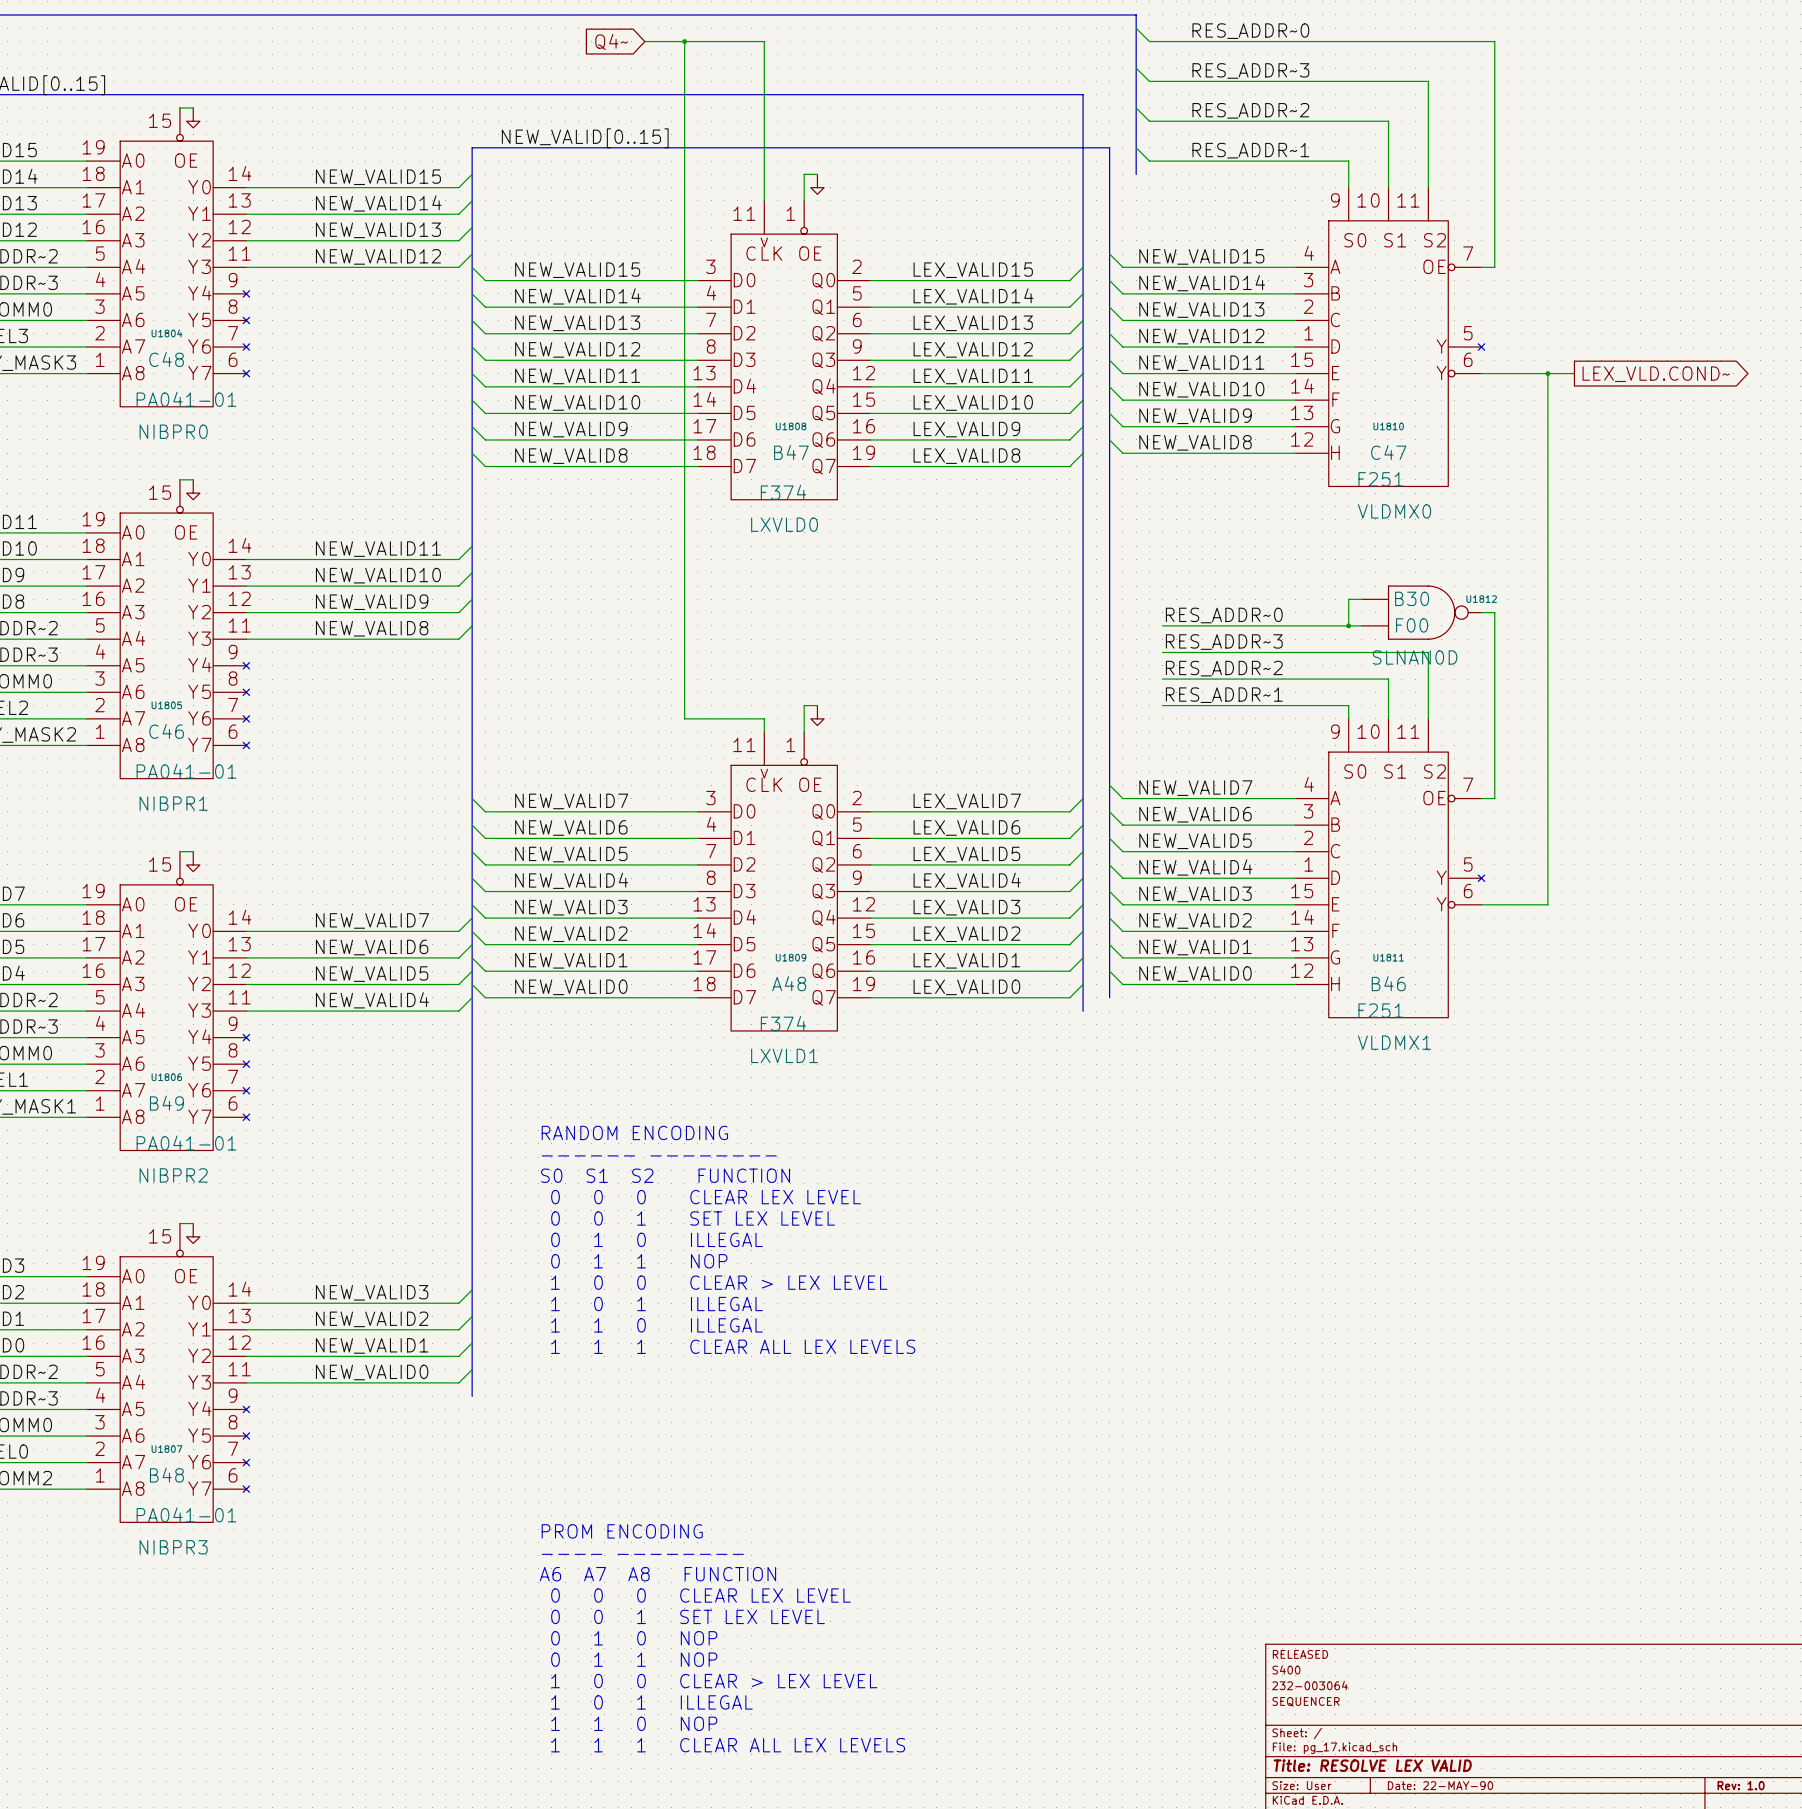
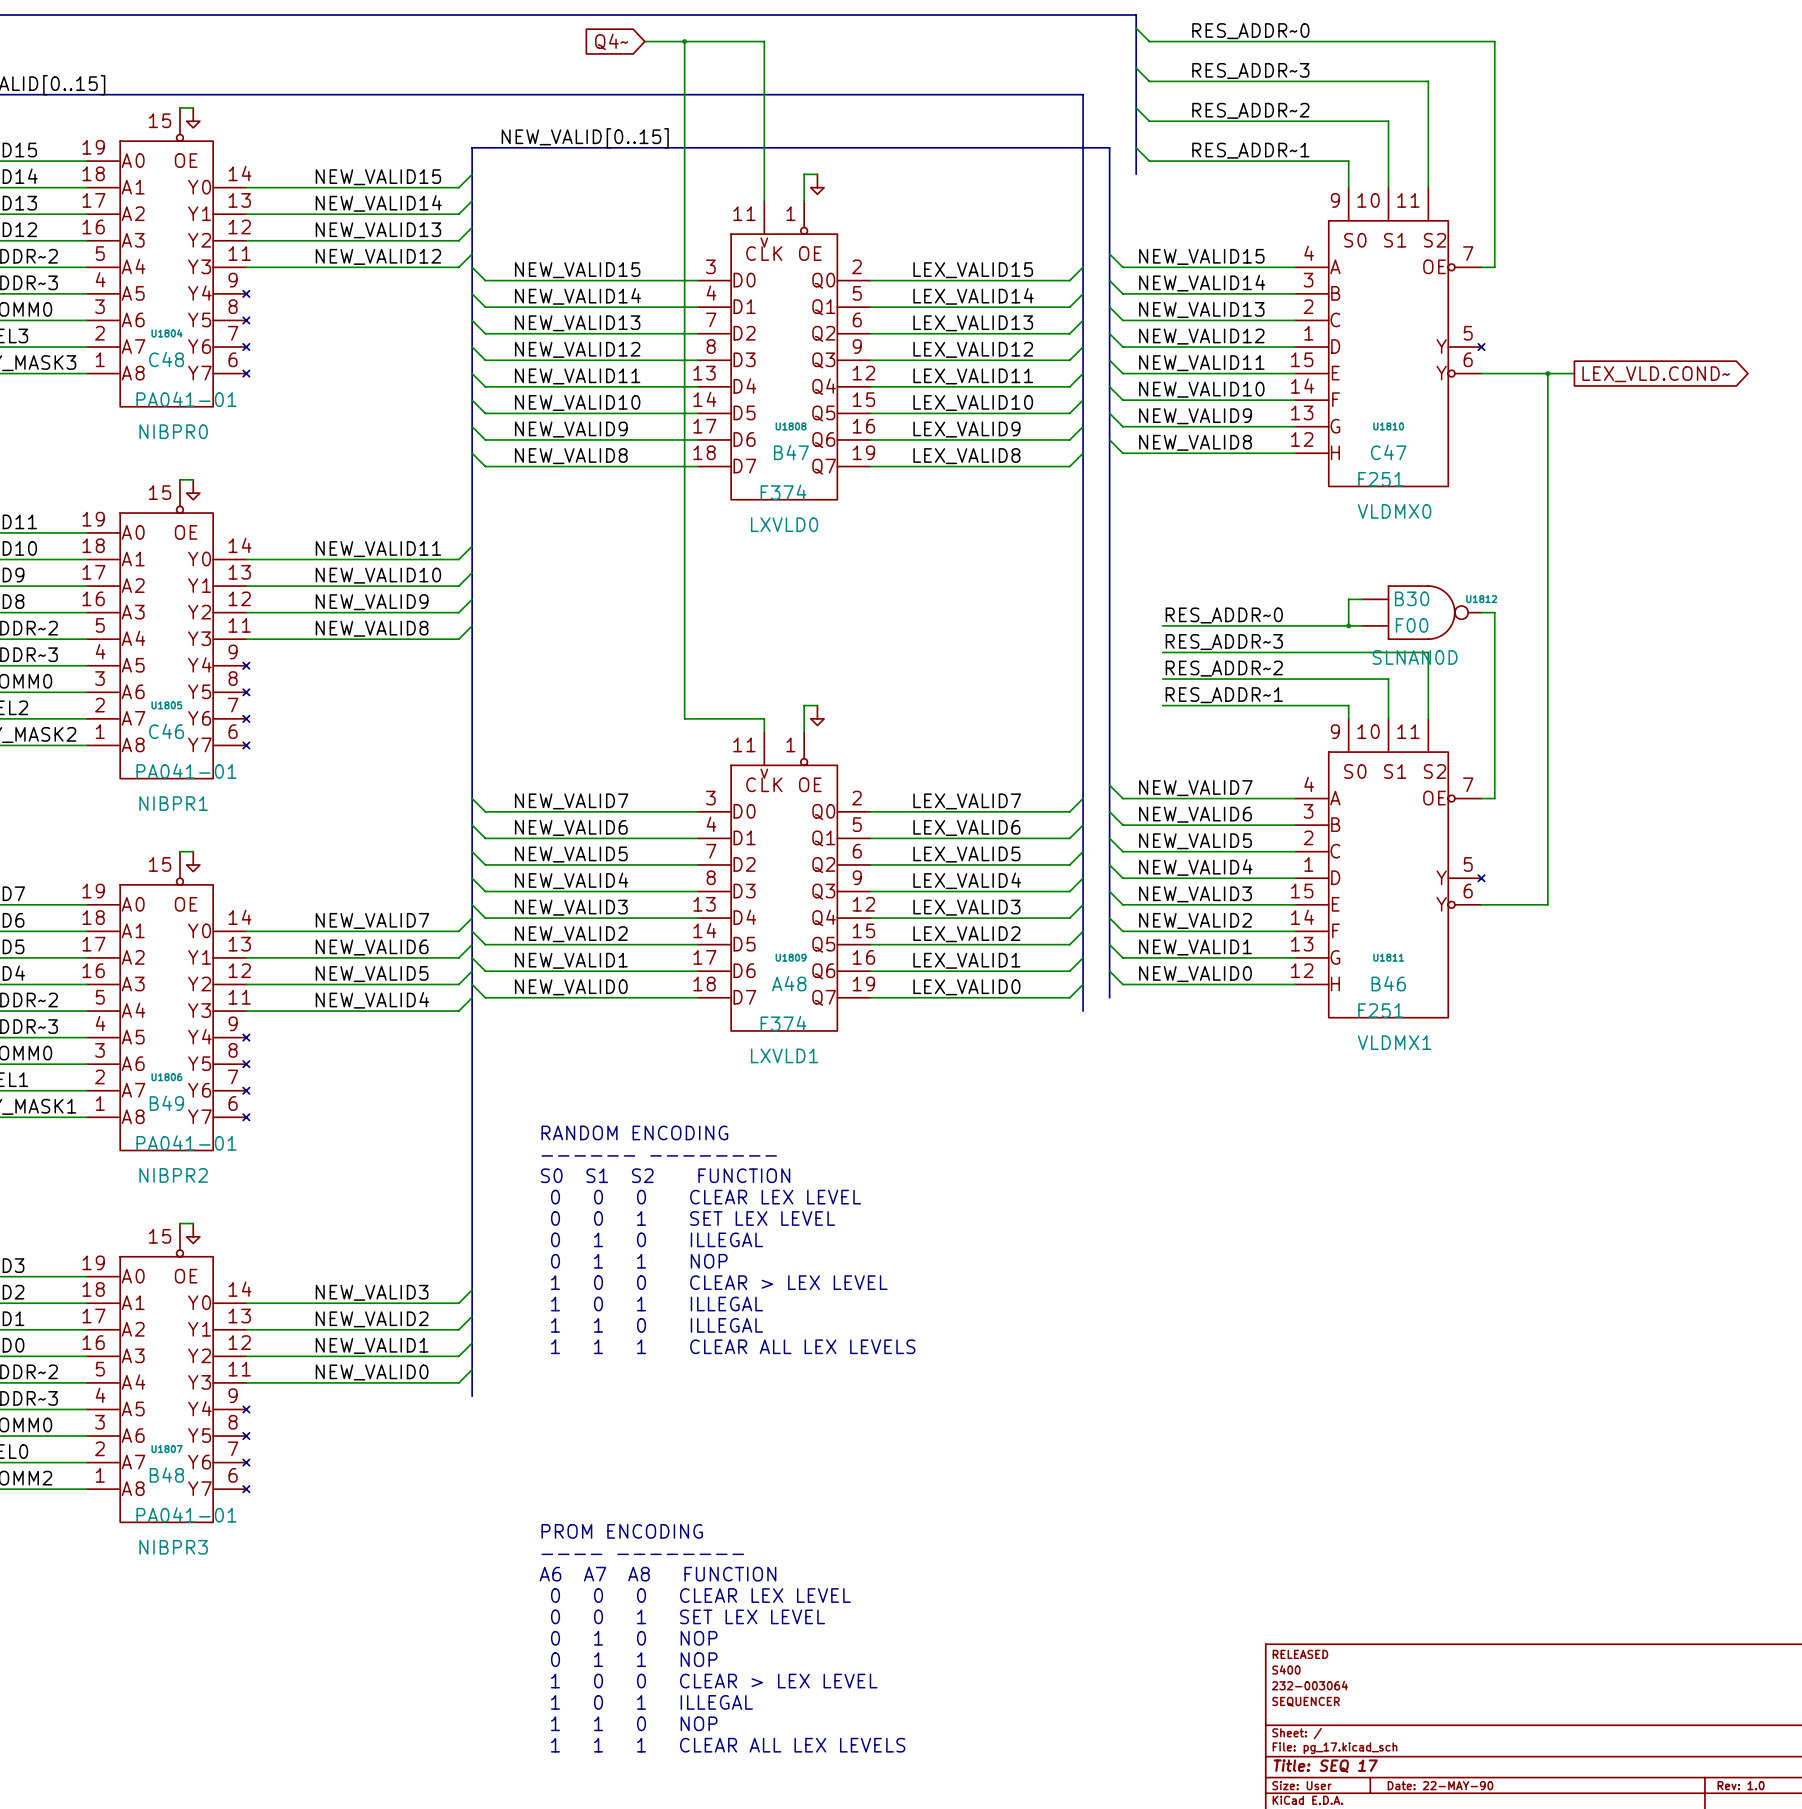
title block: Title: RESOLVE LEX VALID (1372, 1765) -> Title: SEQ 17 (1325, 1766)

